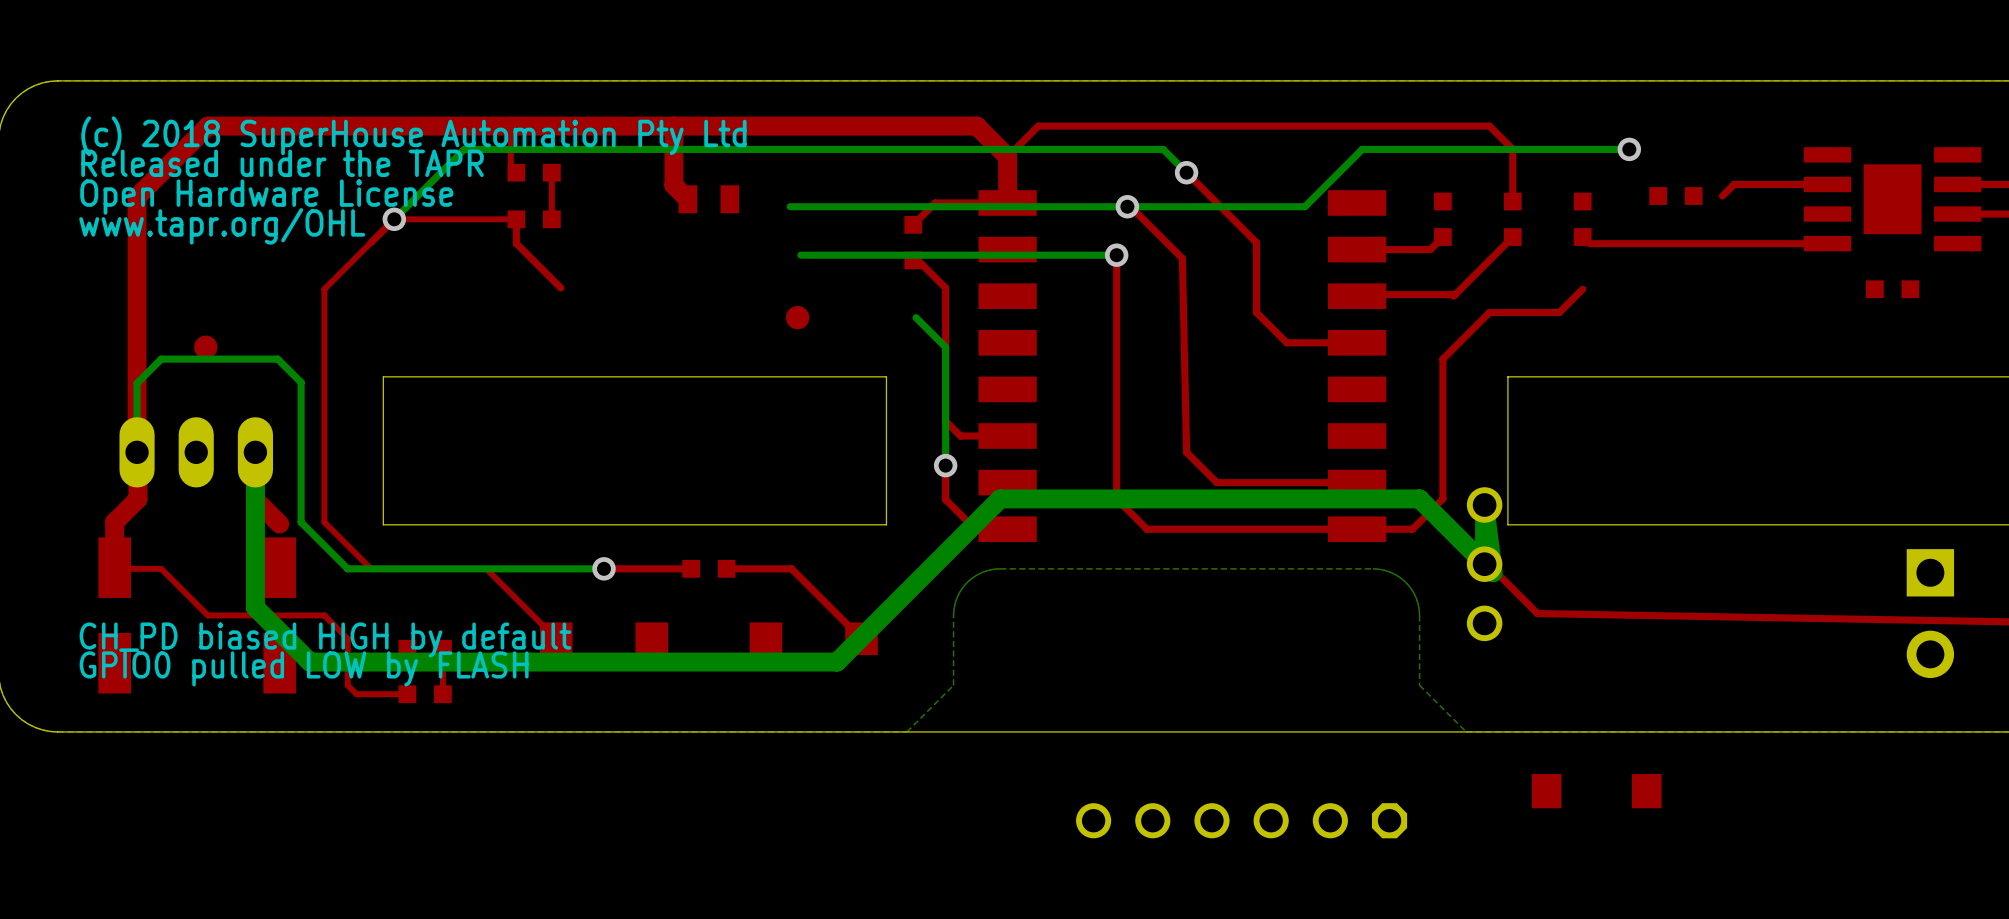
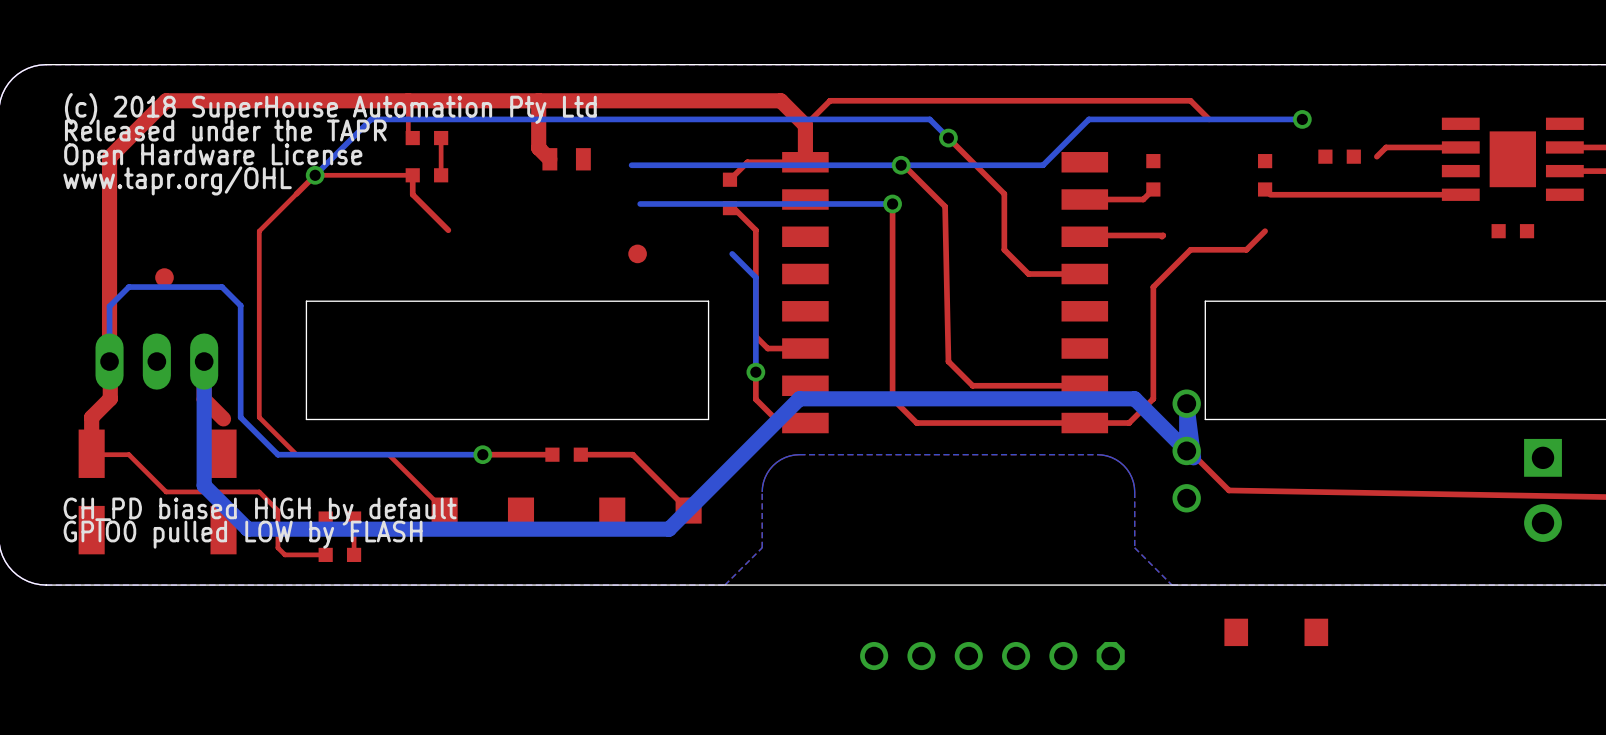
top track: (1512, 149) (1512, 201) -> none
part: (1512, 219) -> none
top track: (1512, 237) (1455, 294) -> none

